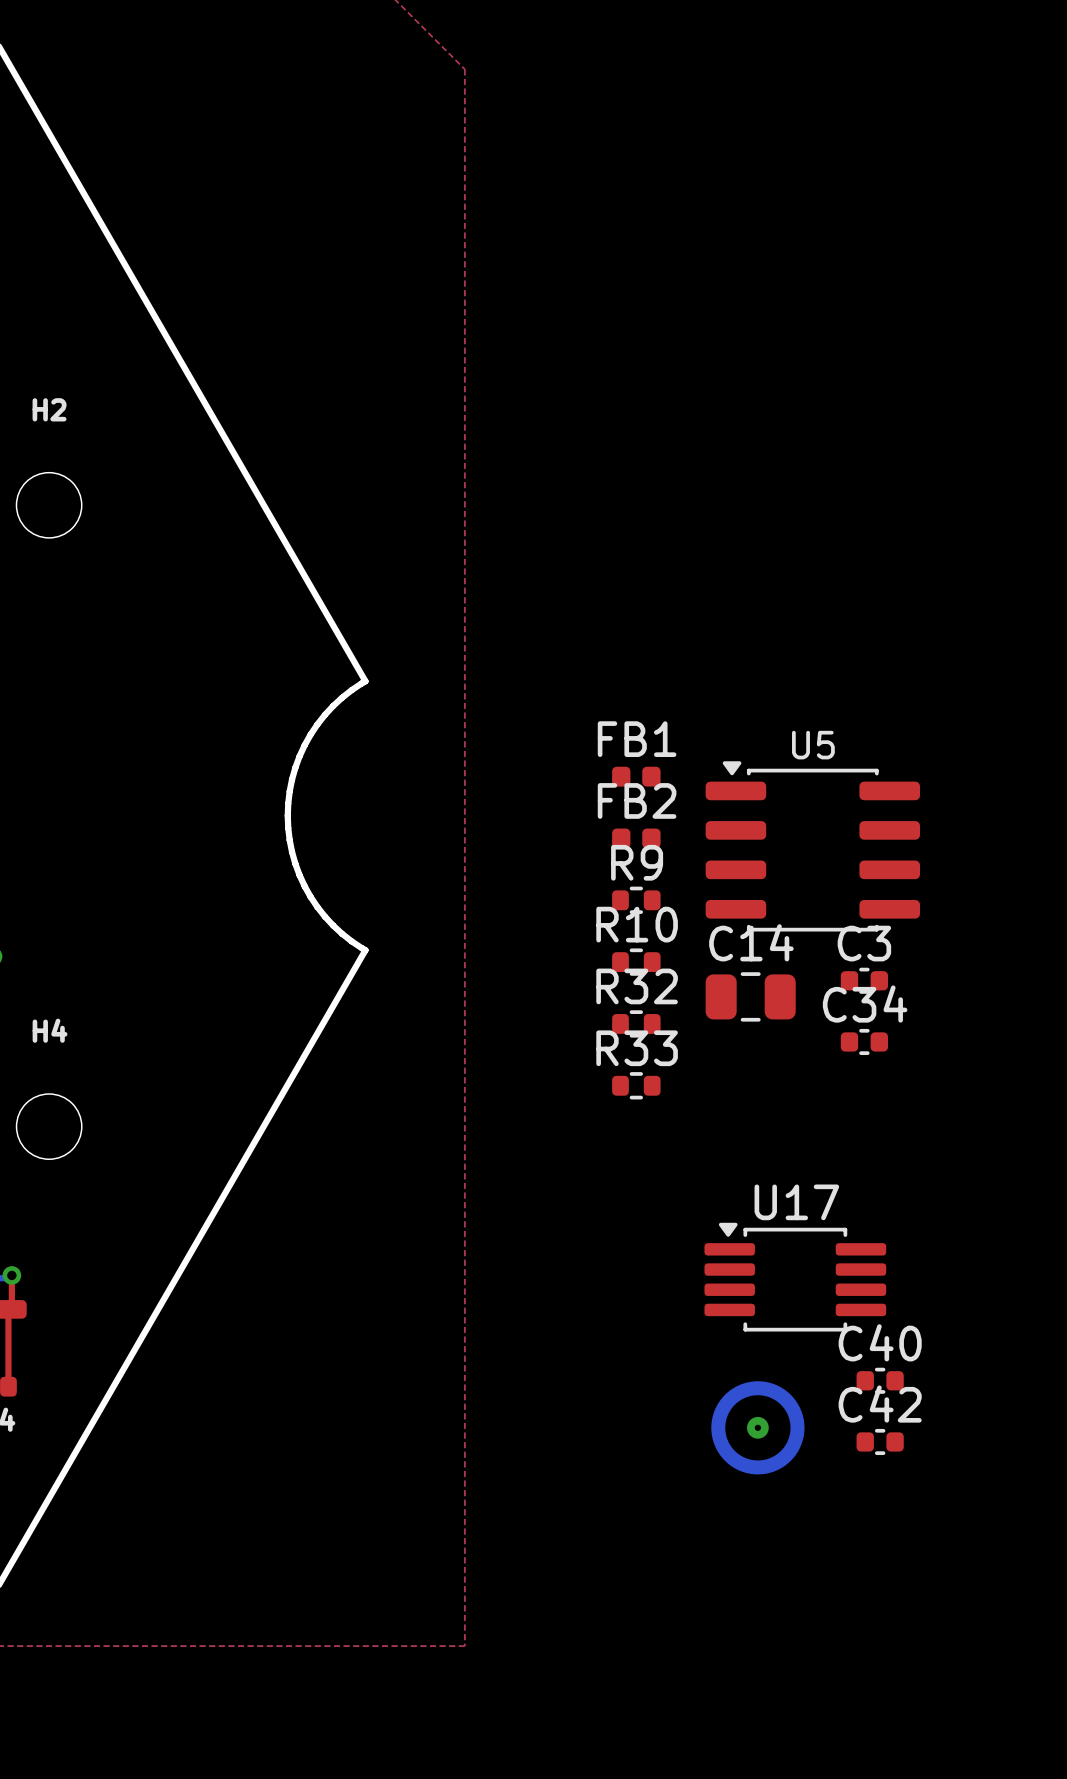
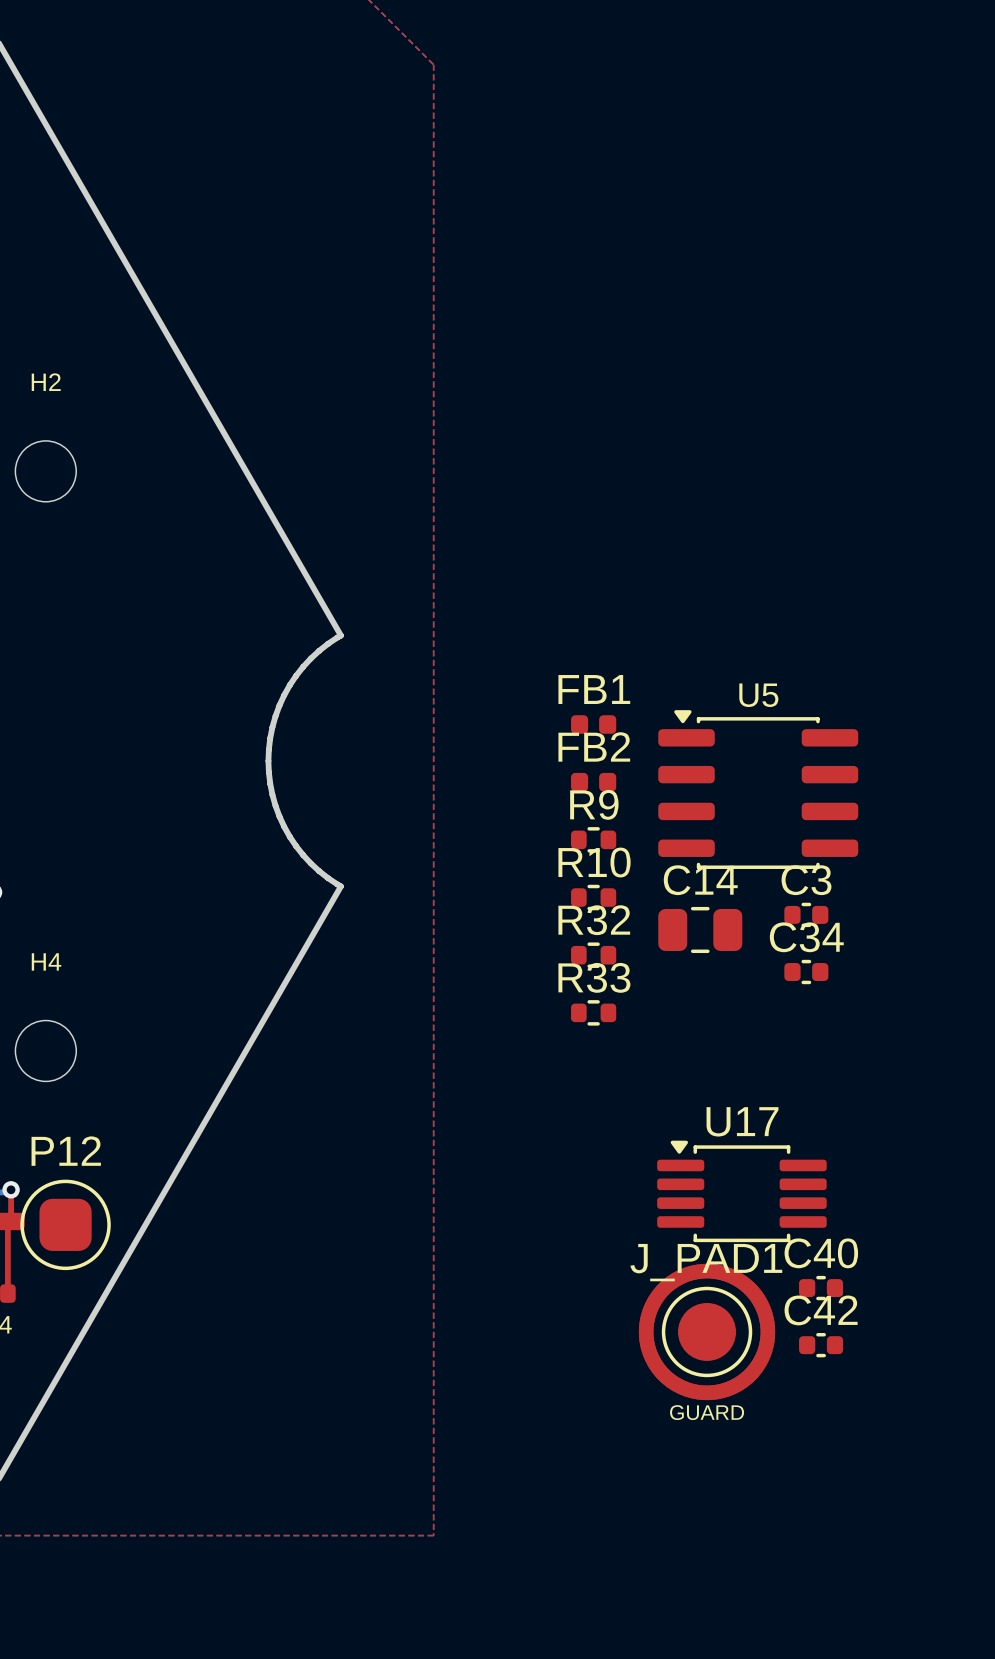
P12: none -> (65, 1224)
part: (757, 1427) -> none
J_PAD1: none -> (707, 1331)

